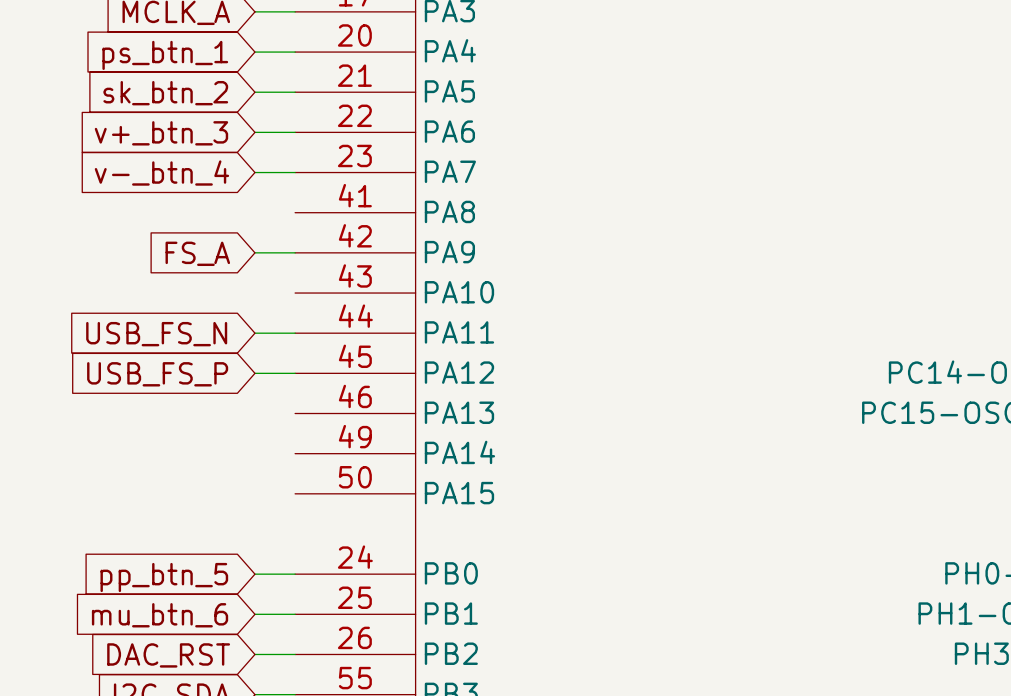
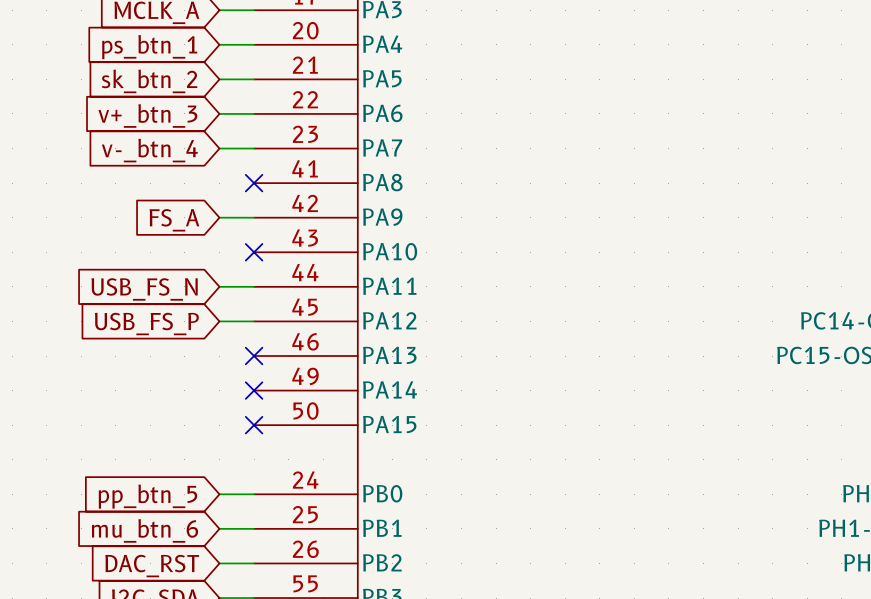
no-connect mark: none -> (254, 183)
no-connect mark: none -> (254, 252)
no-connect mark: none -> (254, 356)
no-connect mark: none -> (254, 390)
no-connect mark: none -> (254, 425)

